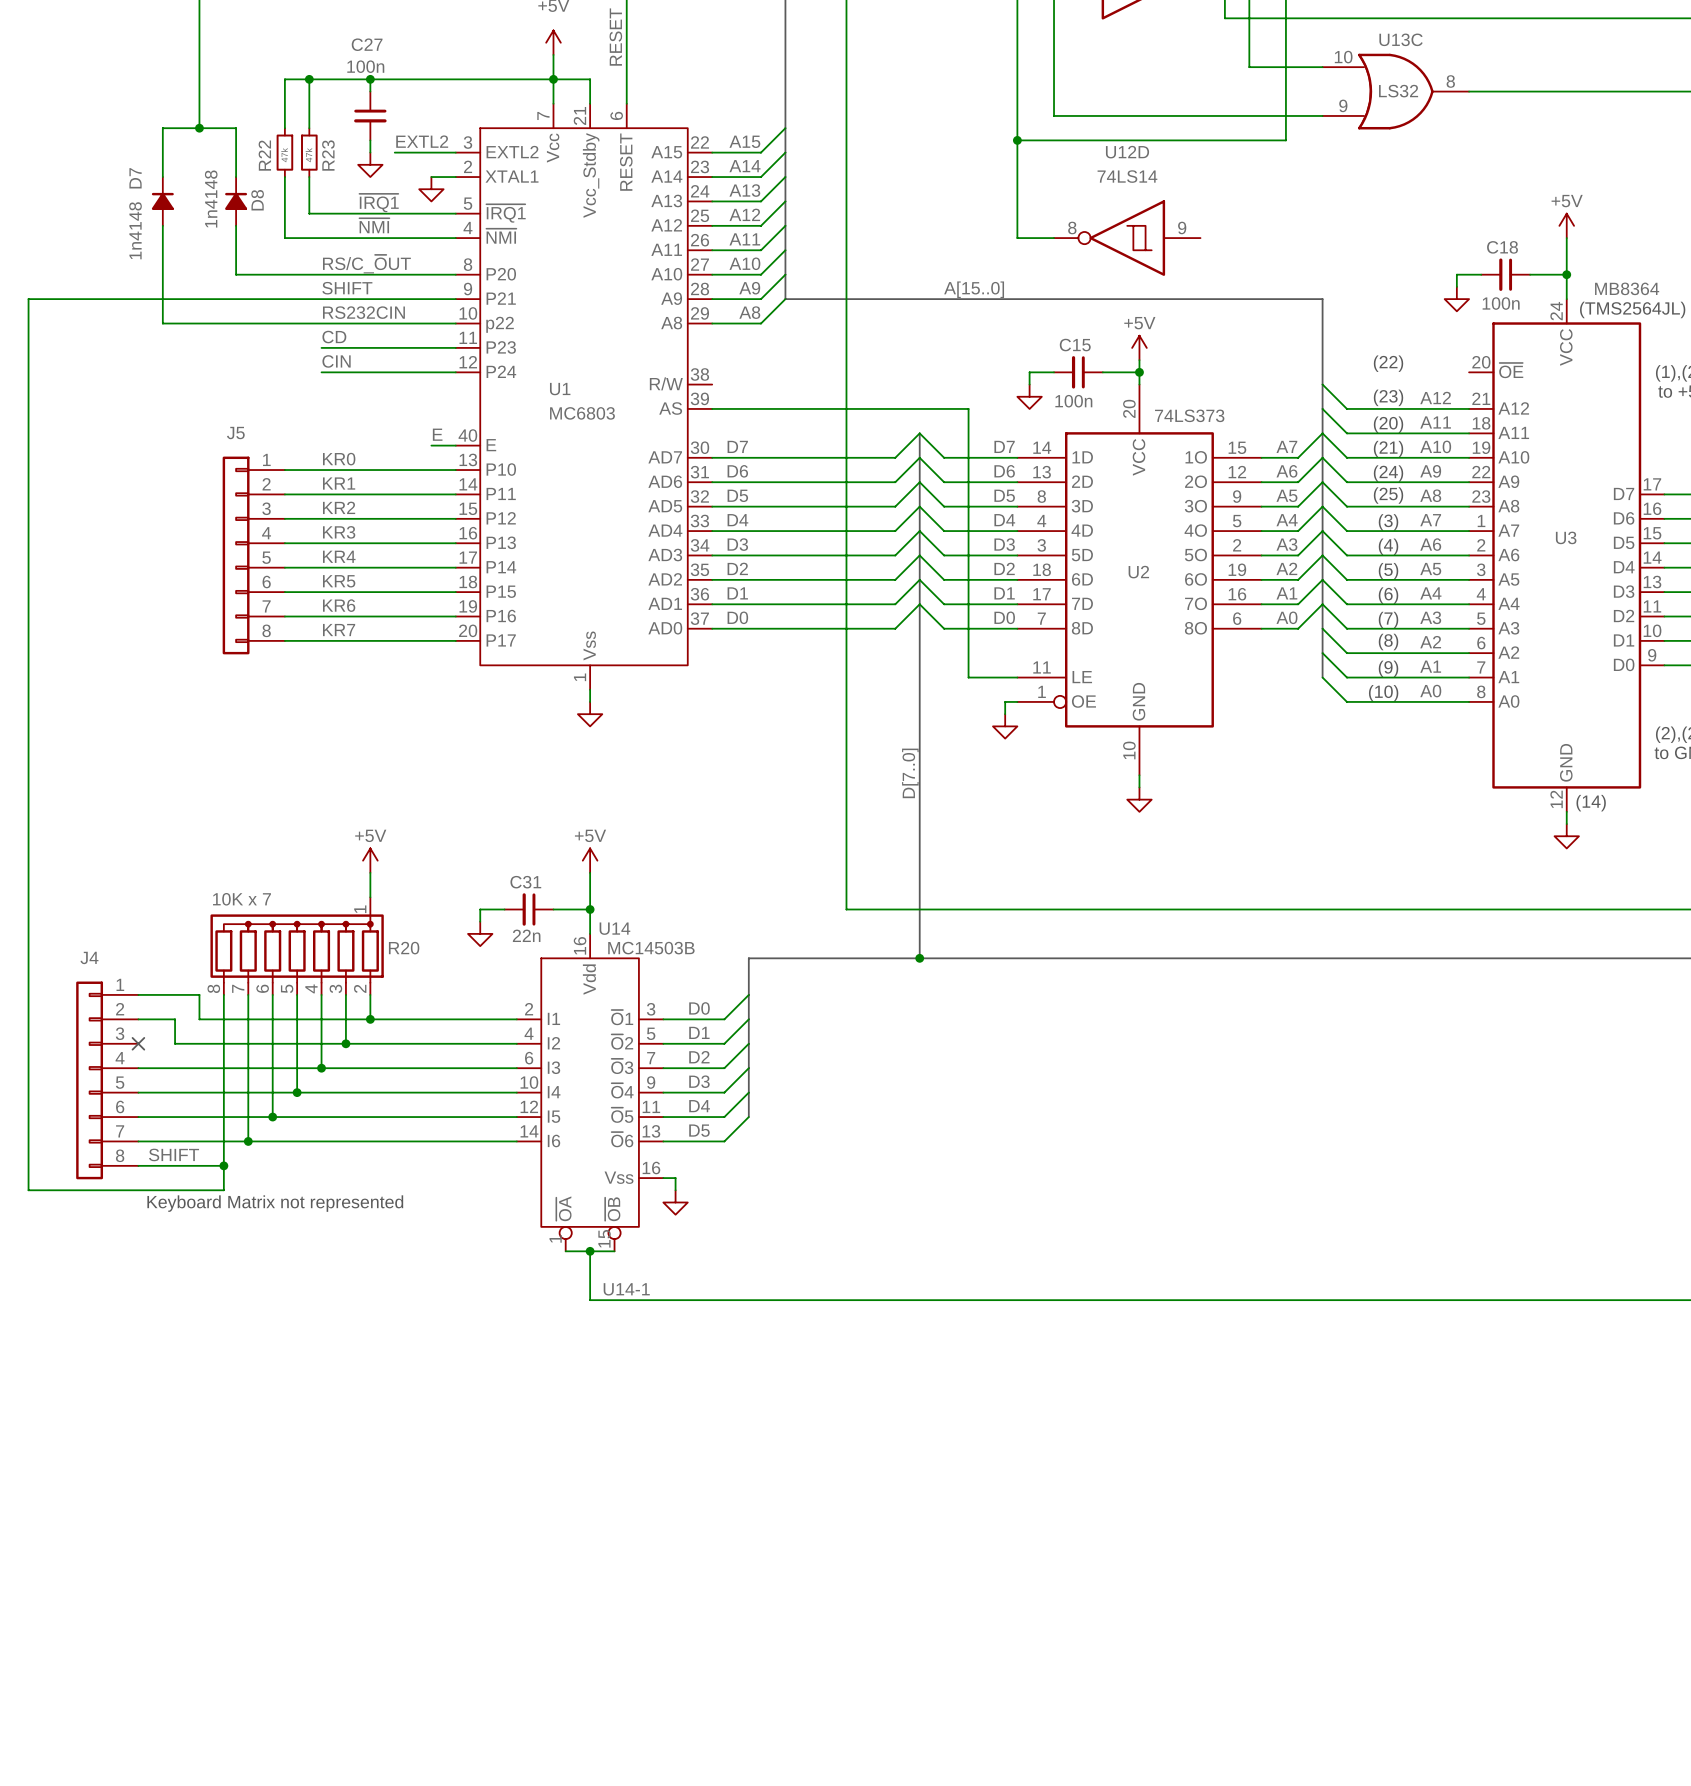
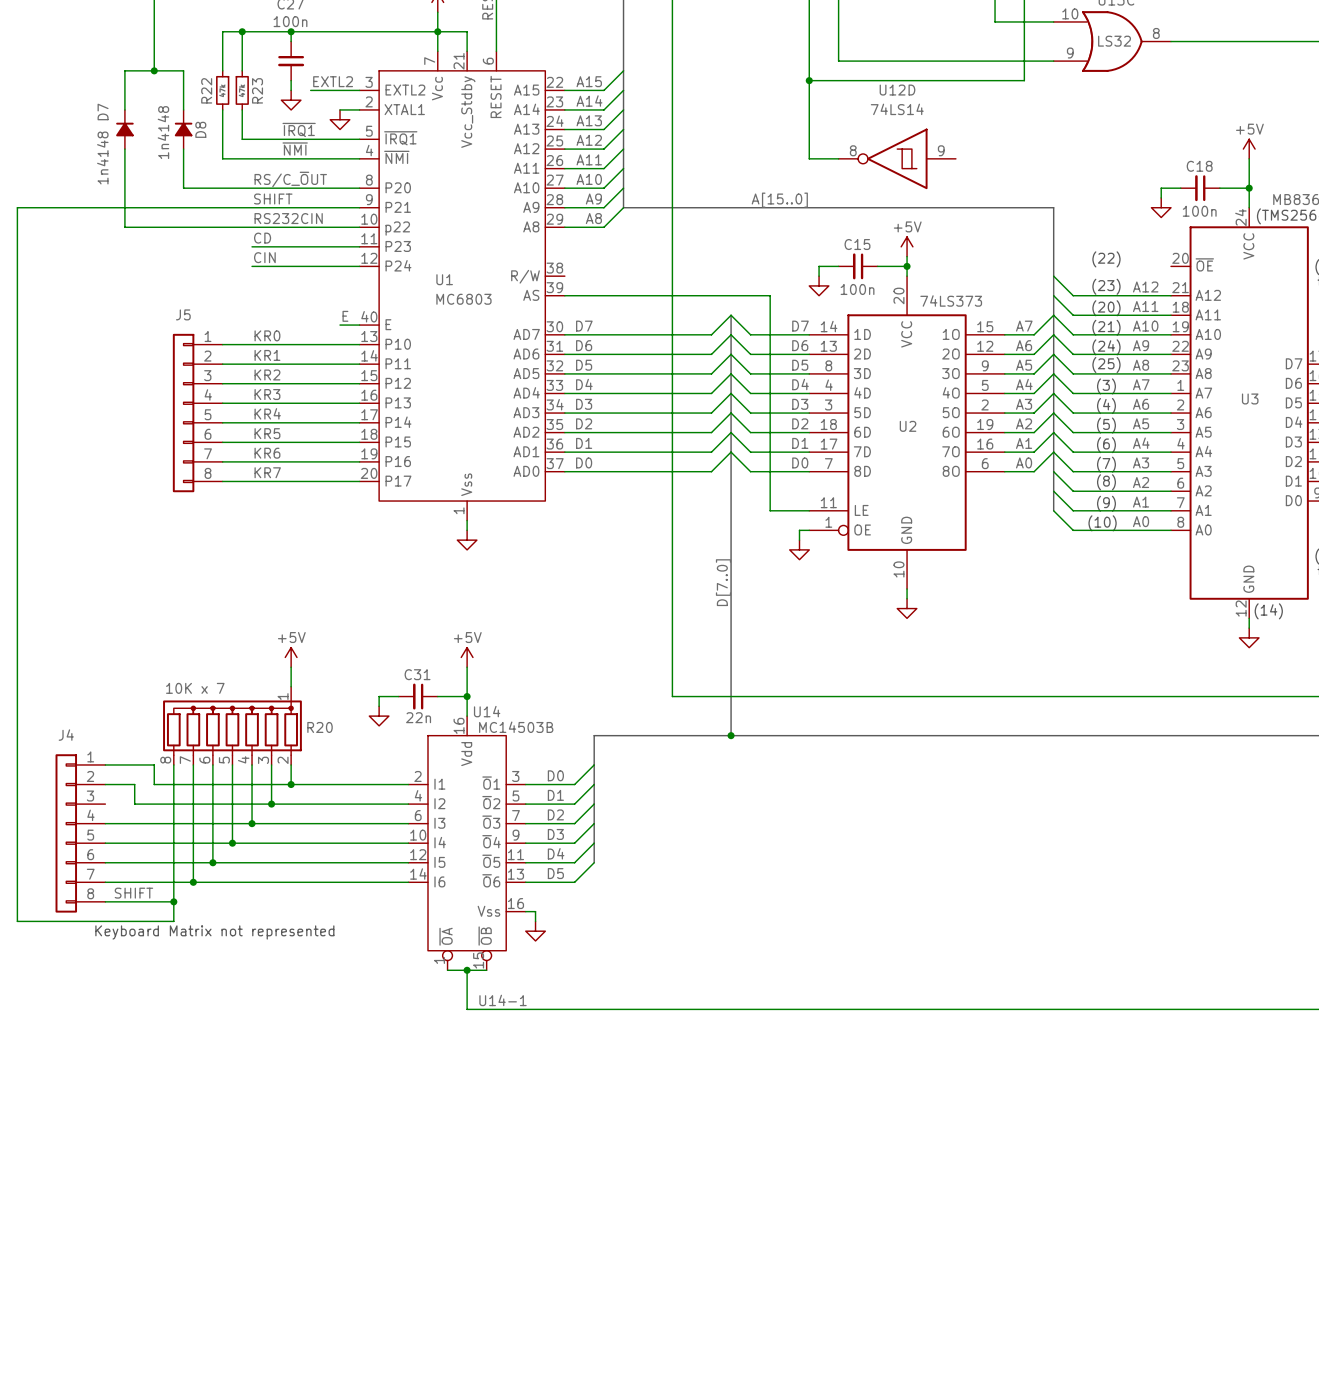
no-connect mark: (138, 1043) -> none

